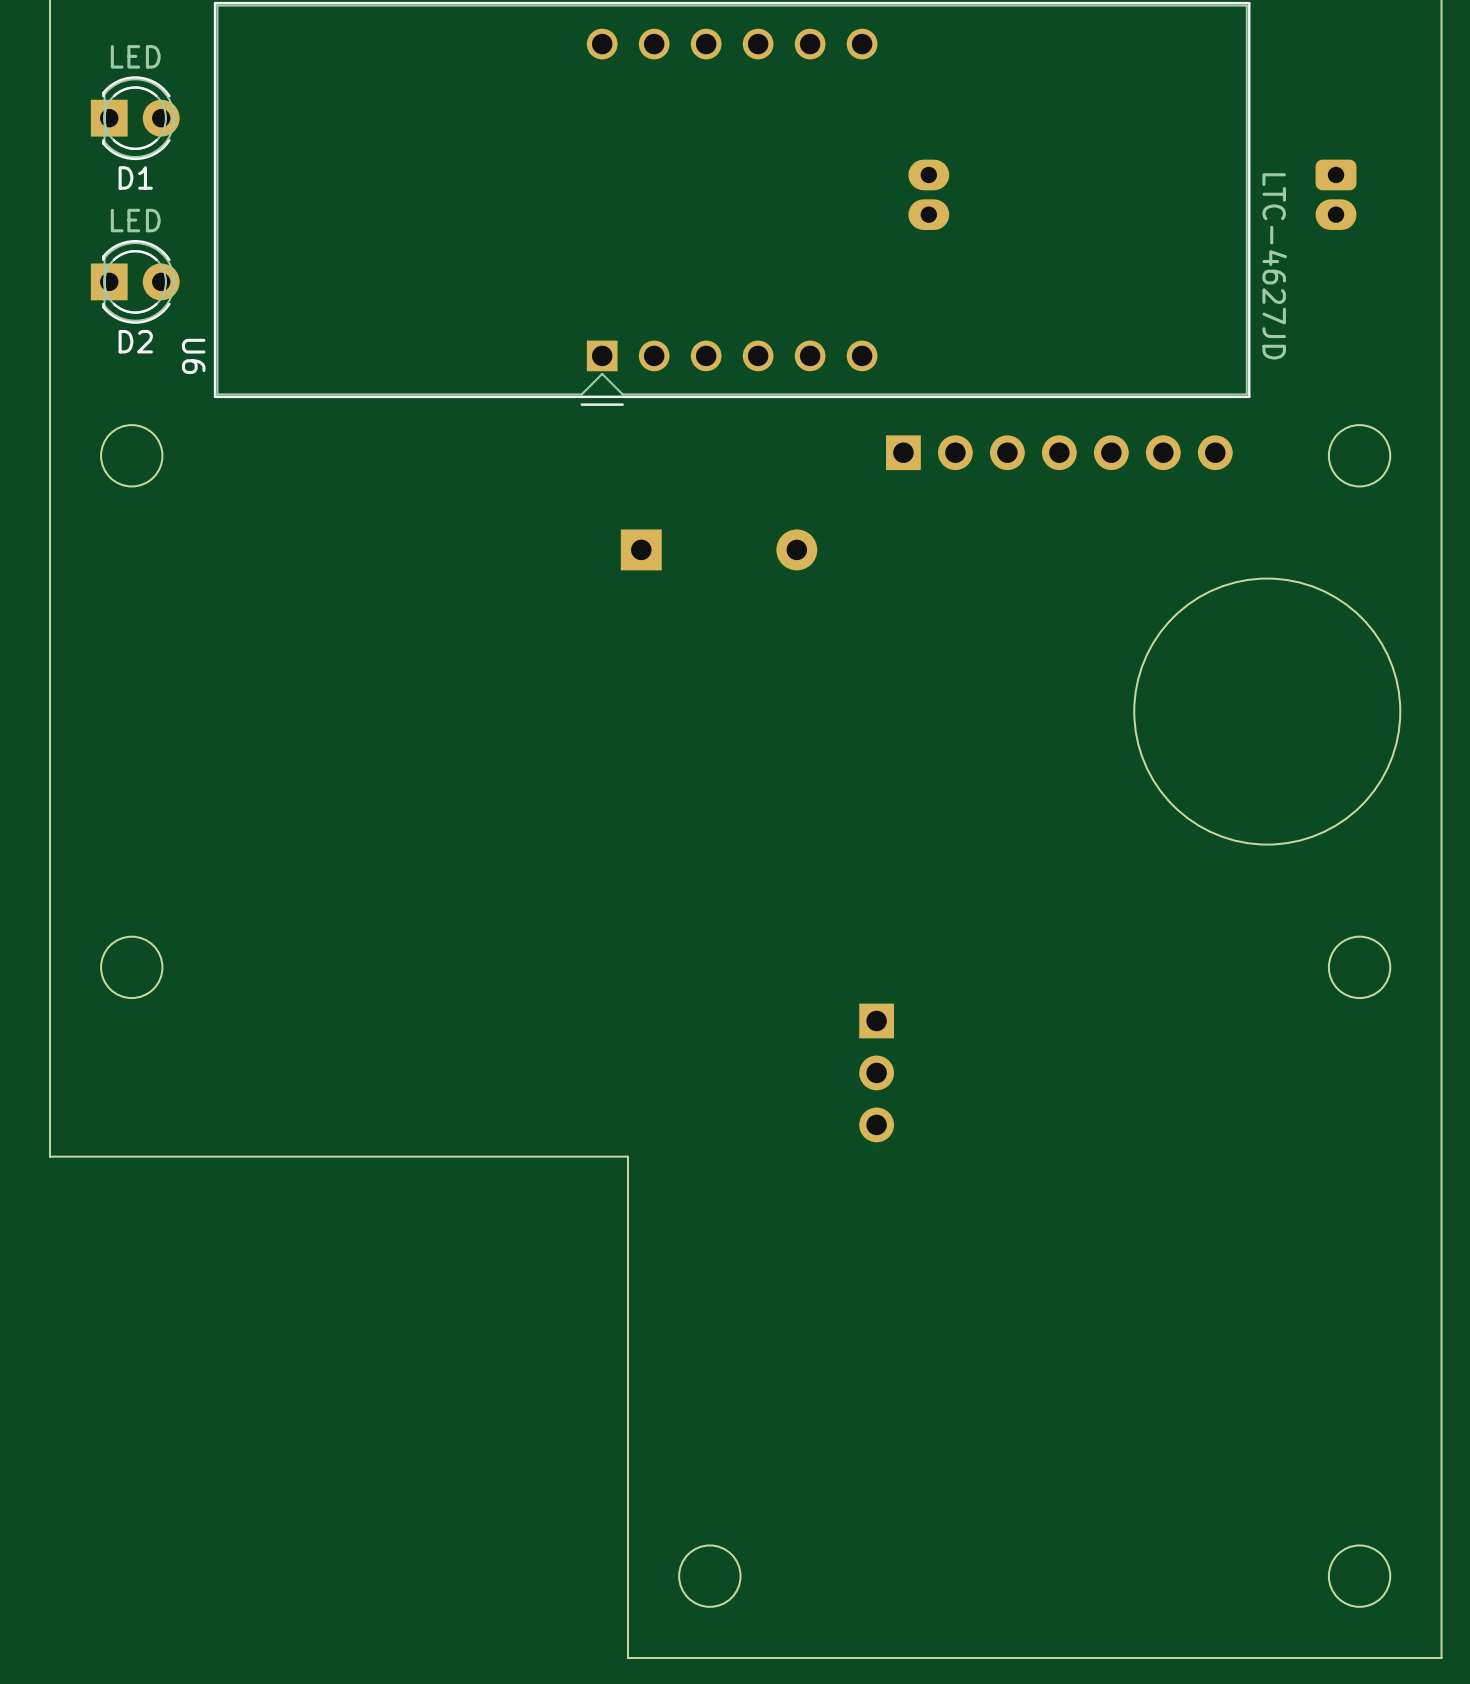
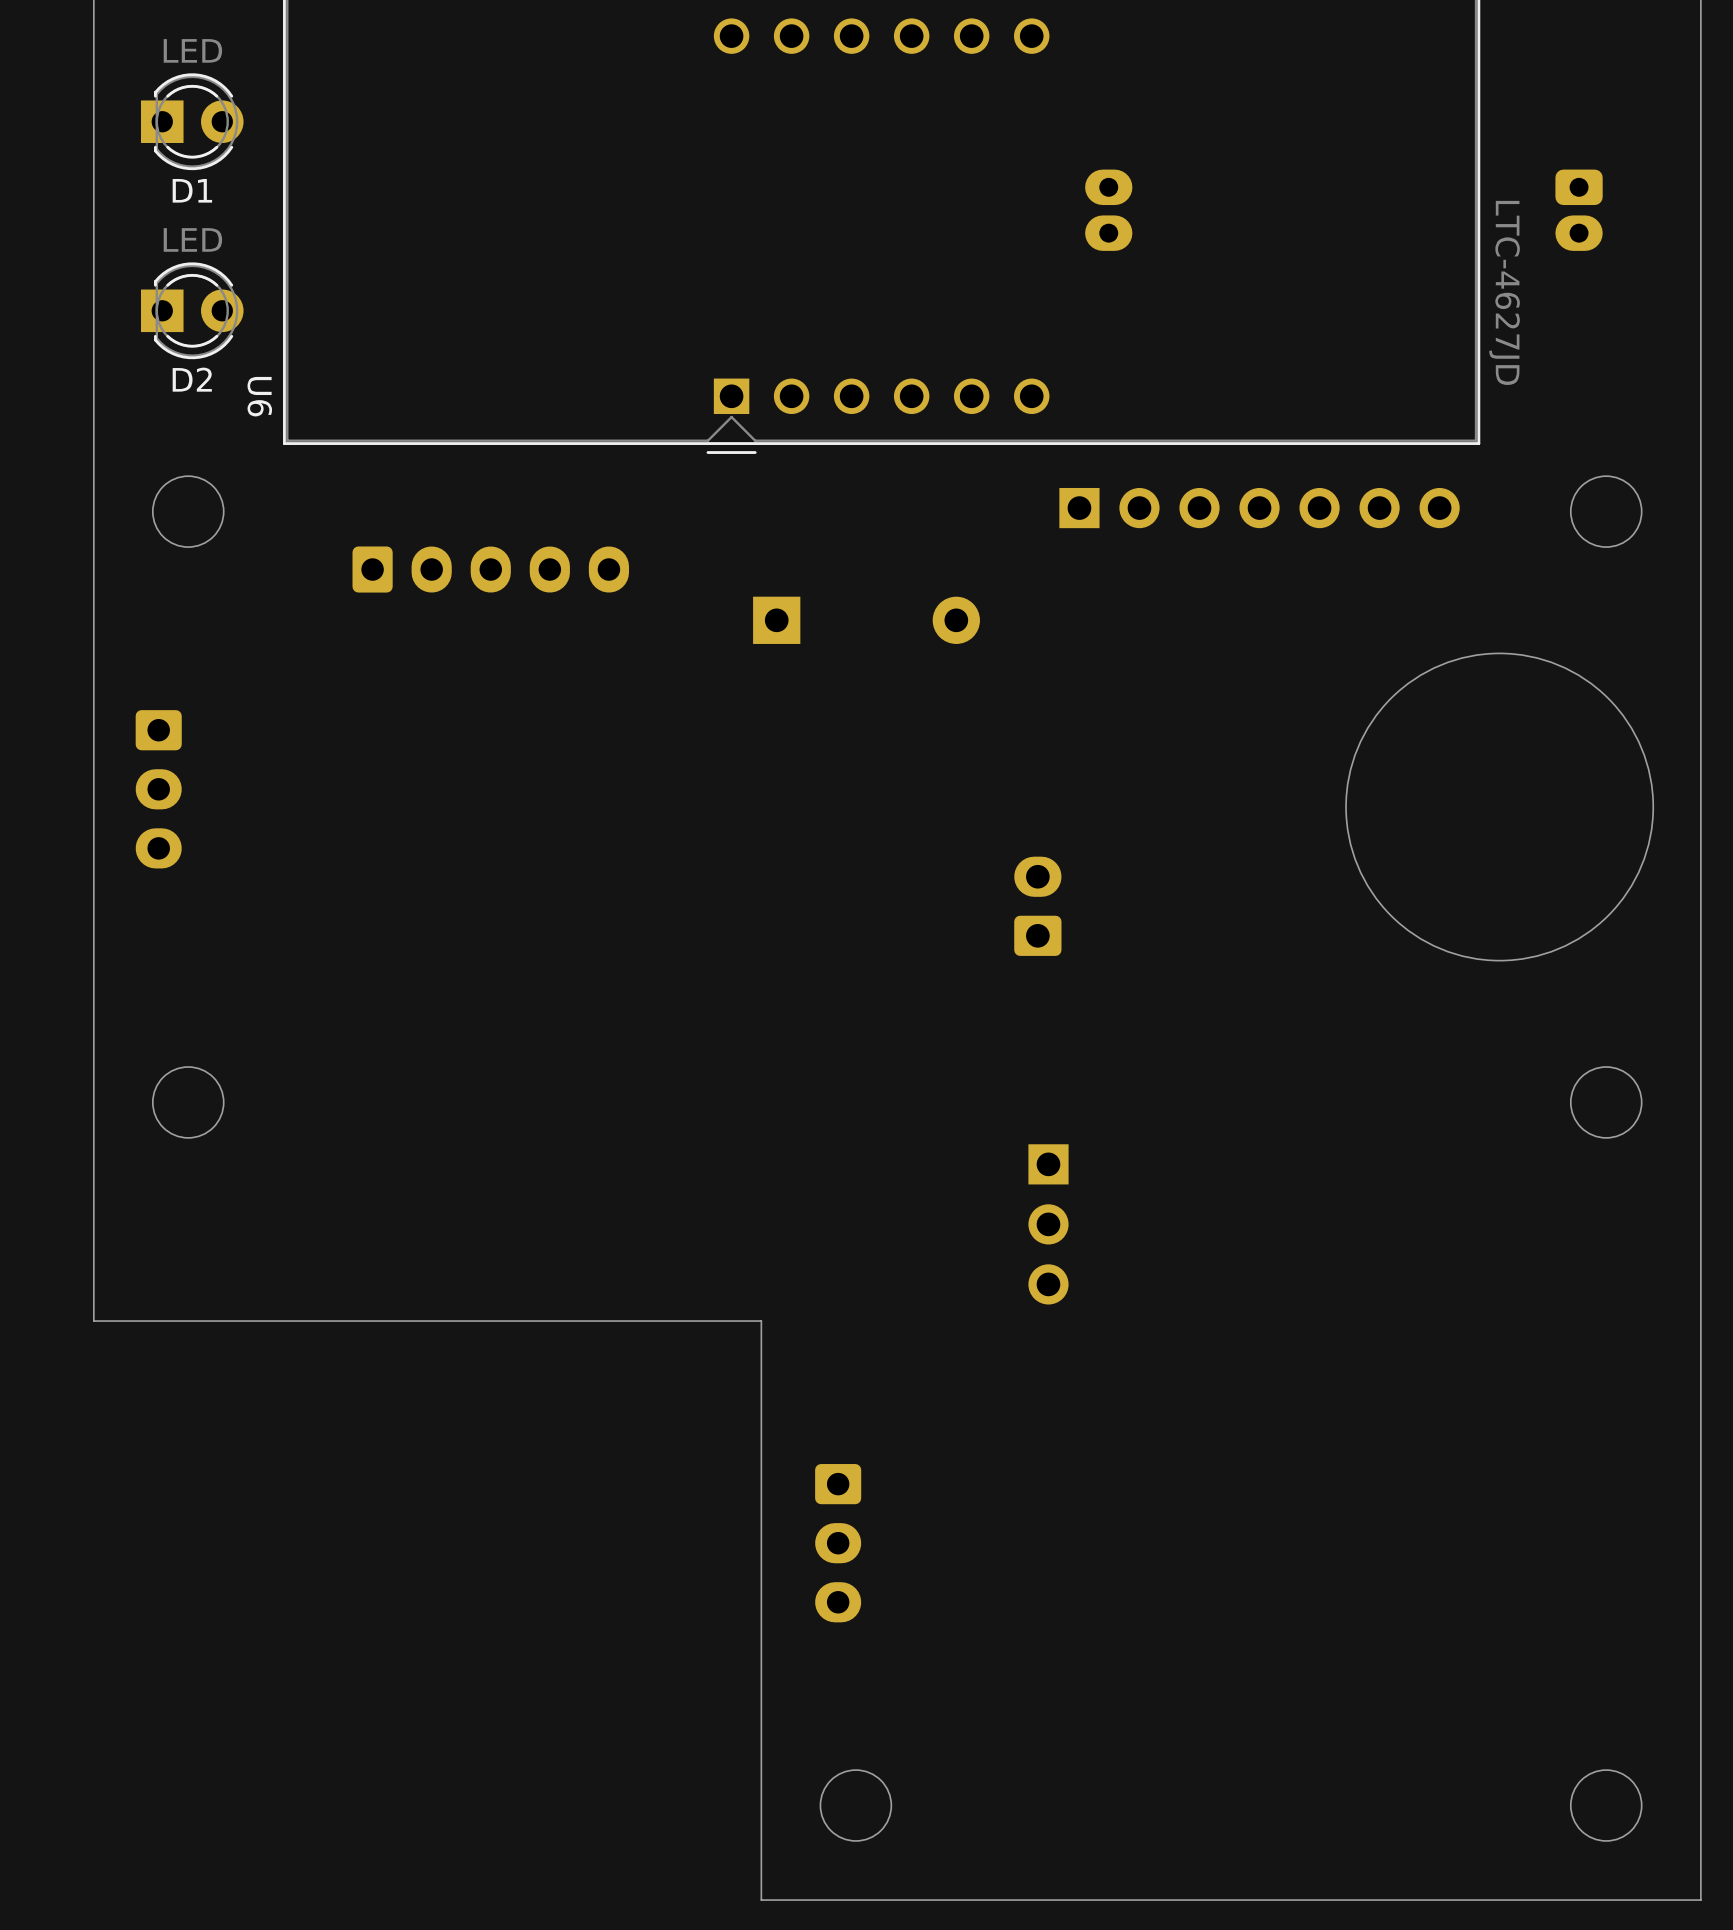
part: none -> (490, 569)
part: none -> (158, 789)
part: none -> (1037, 906)
part: none -> (838, 1543)

